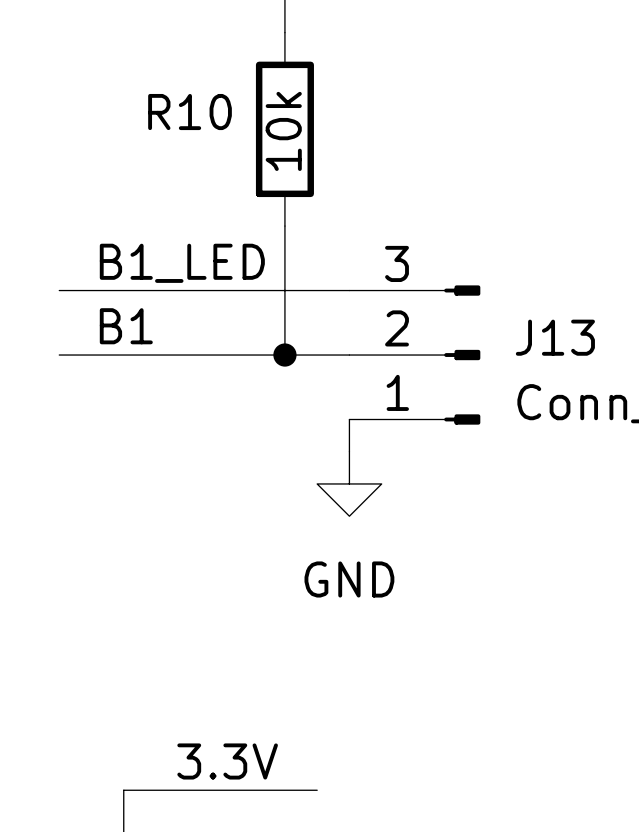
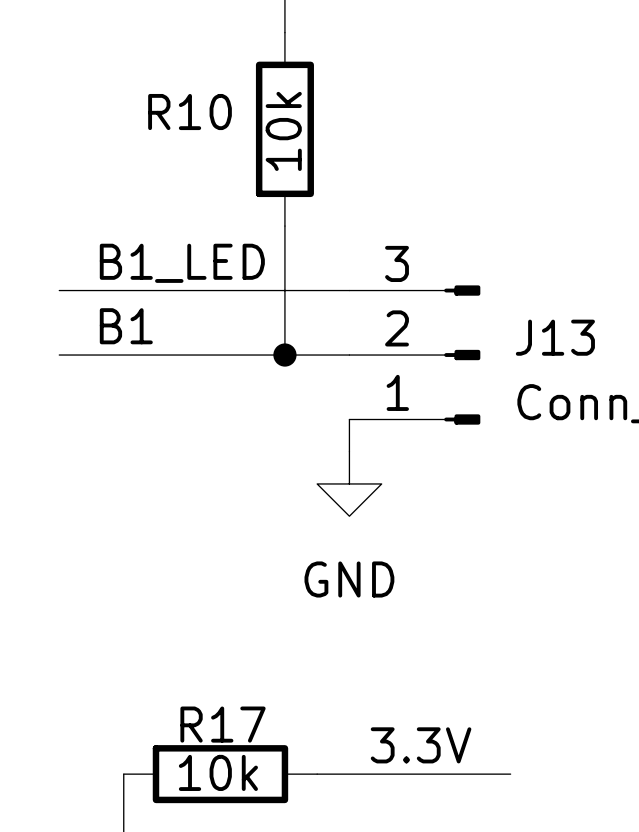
label position: 3.3V (227, 761) -> 3.3V (421, 745)
R17: none -> 10k (220, 774)
wire: none -> (317, 774) (510, 774)
wire: (123, 790) (317, 790) -> (123, 790) (123, 774)

